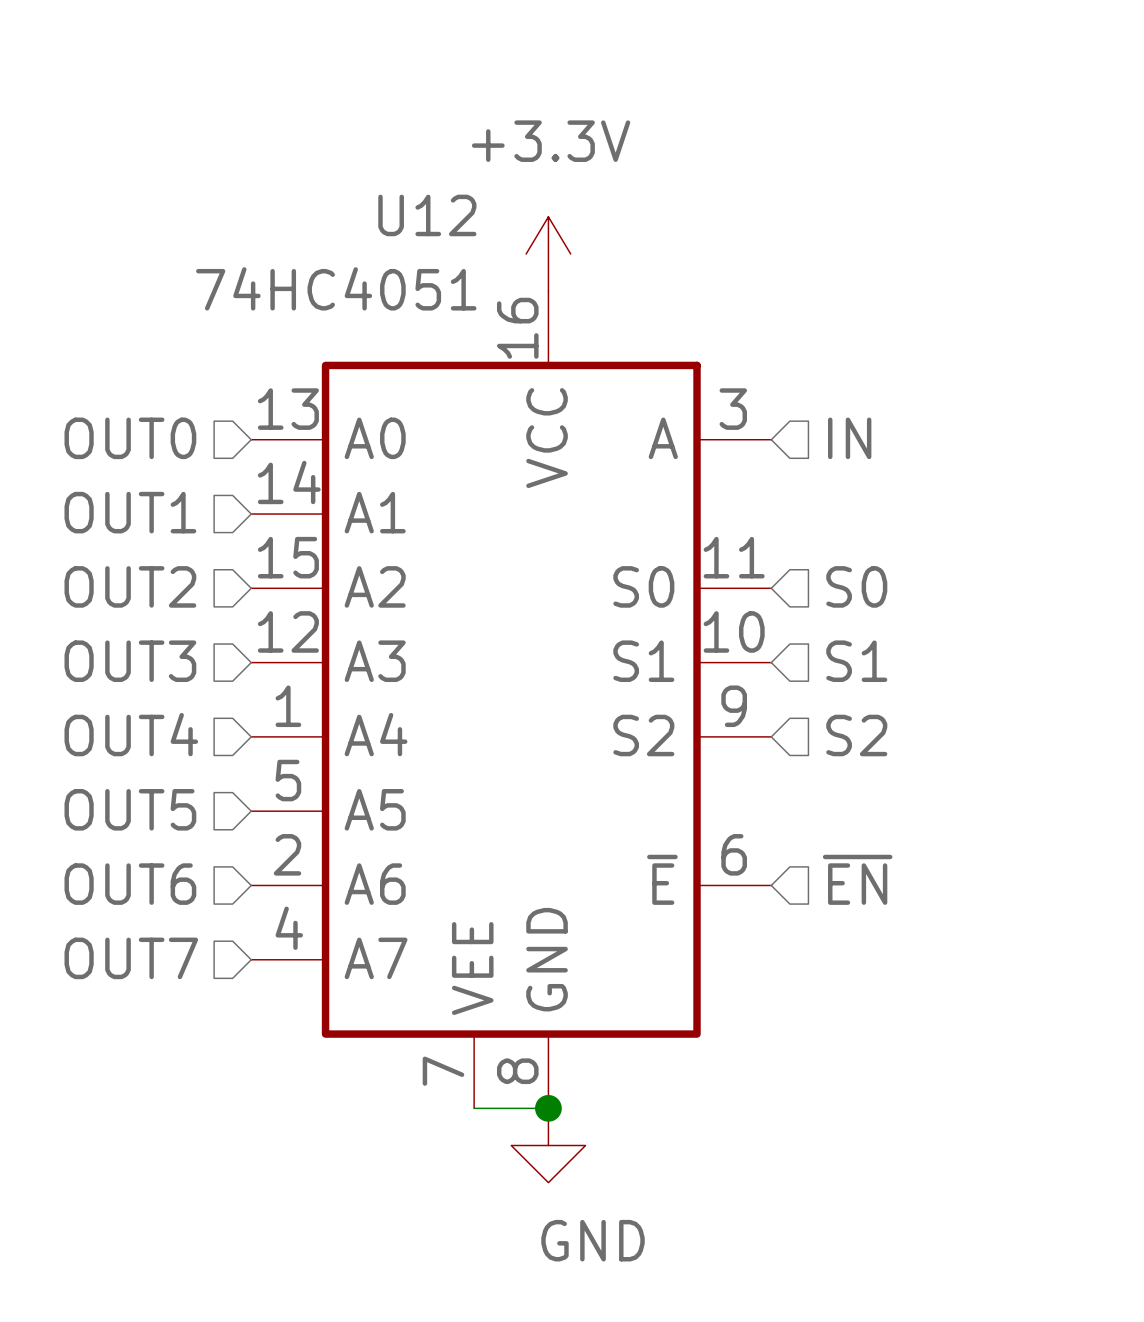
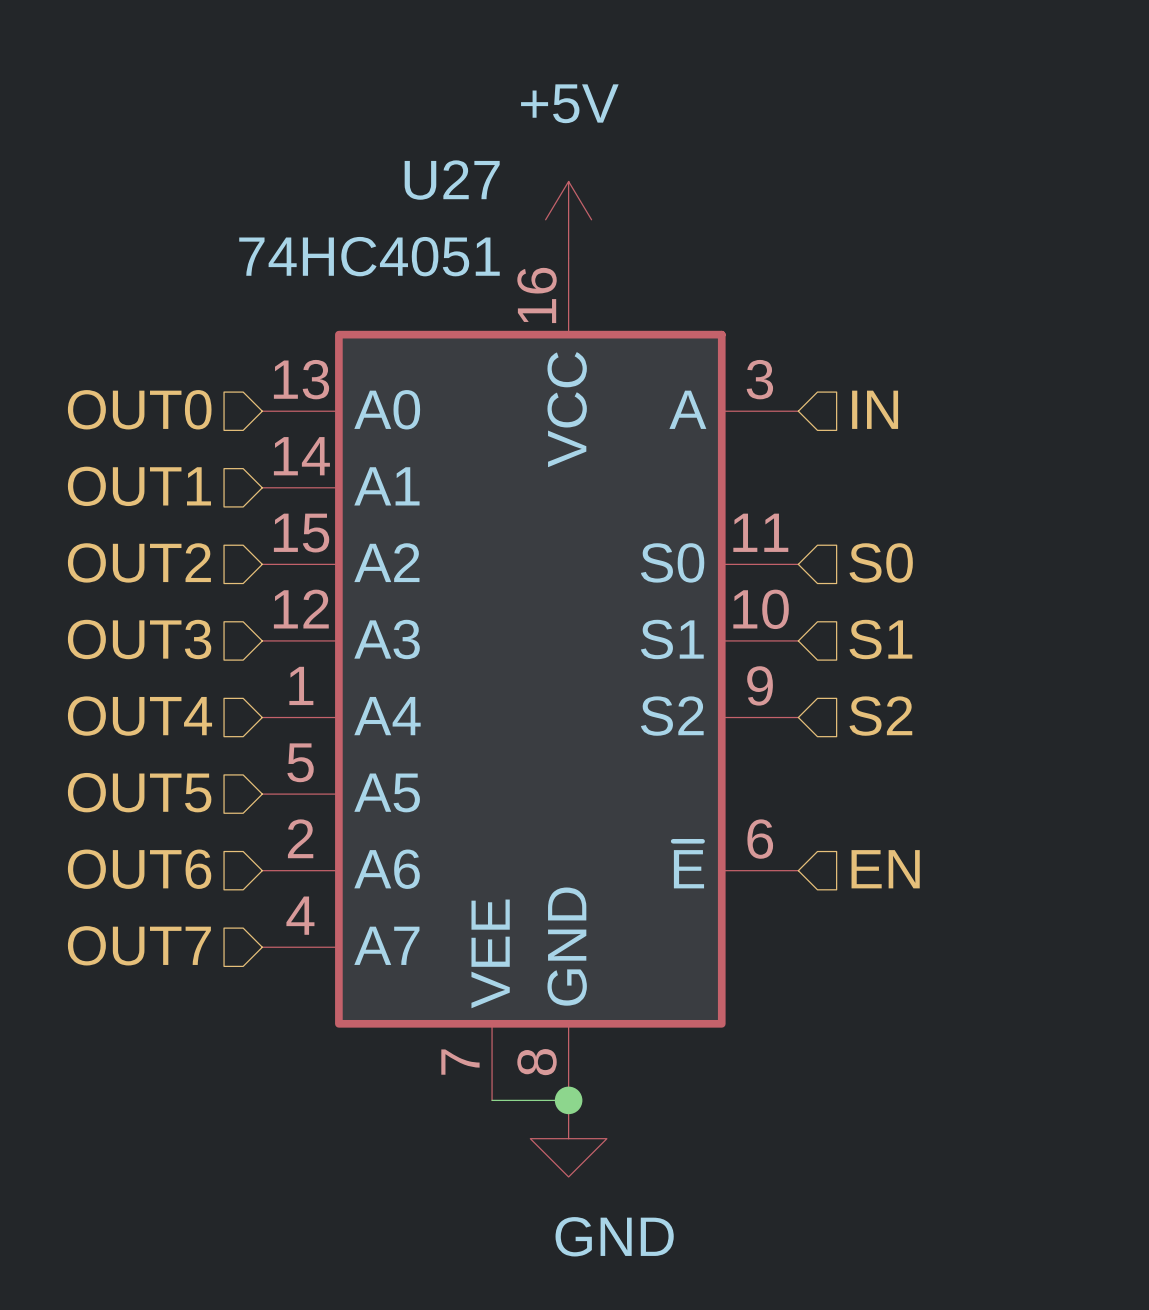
U12 name: U12 (427, 215) -> U27 (452, 180)
power symbol: +3.3V (548, 253) -> +5V (568, 219)
hierarchical label: ~{EN} (857, 879) -> EN (885, 869)

